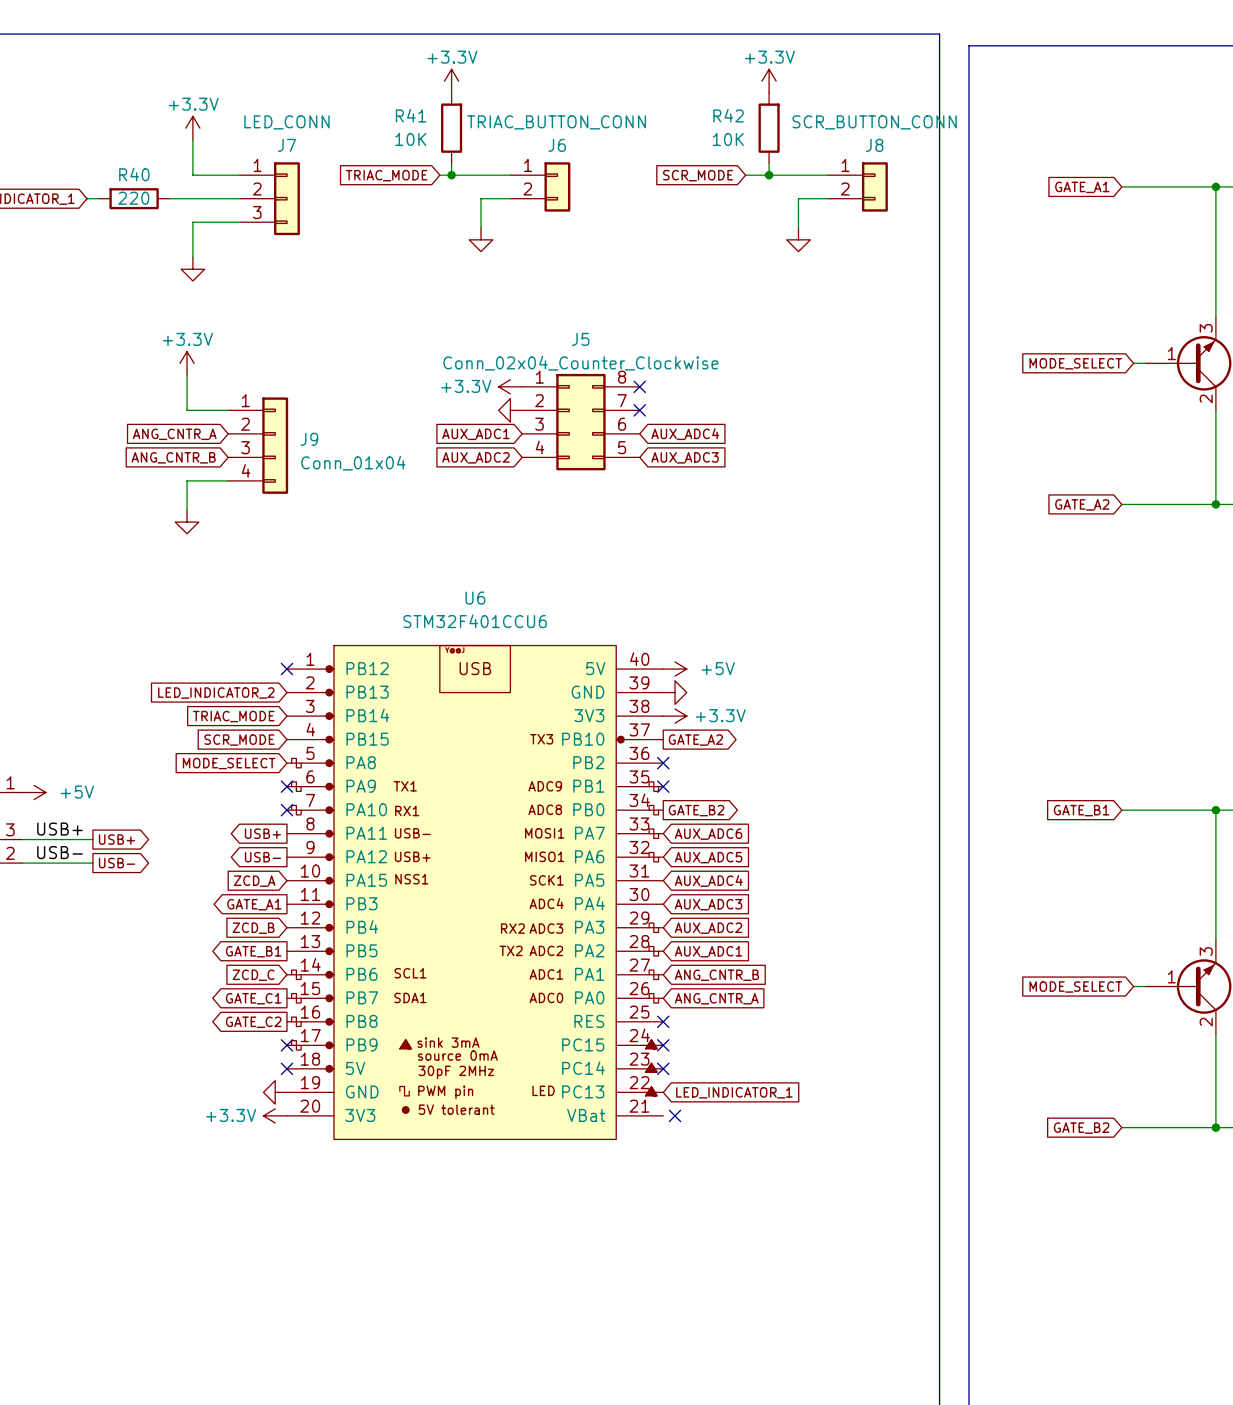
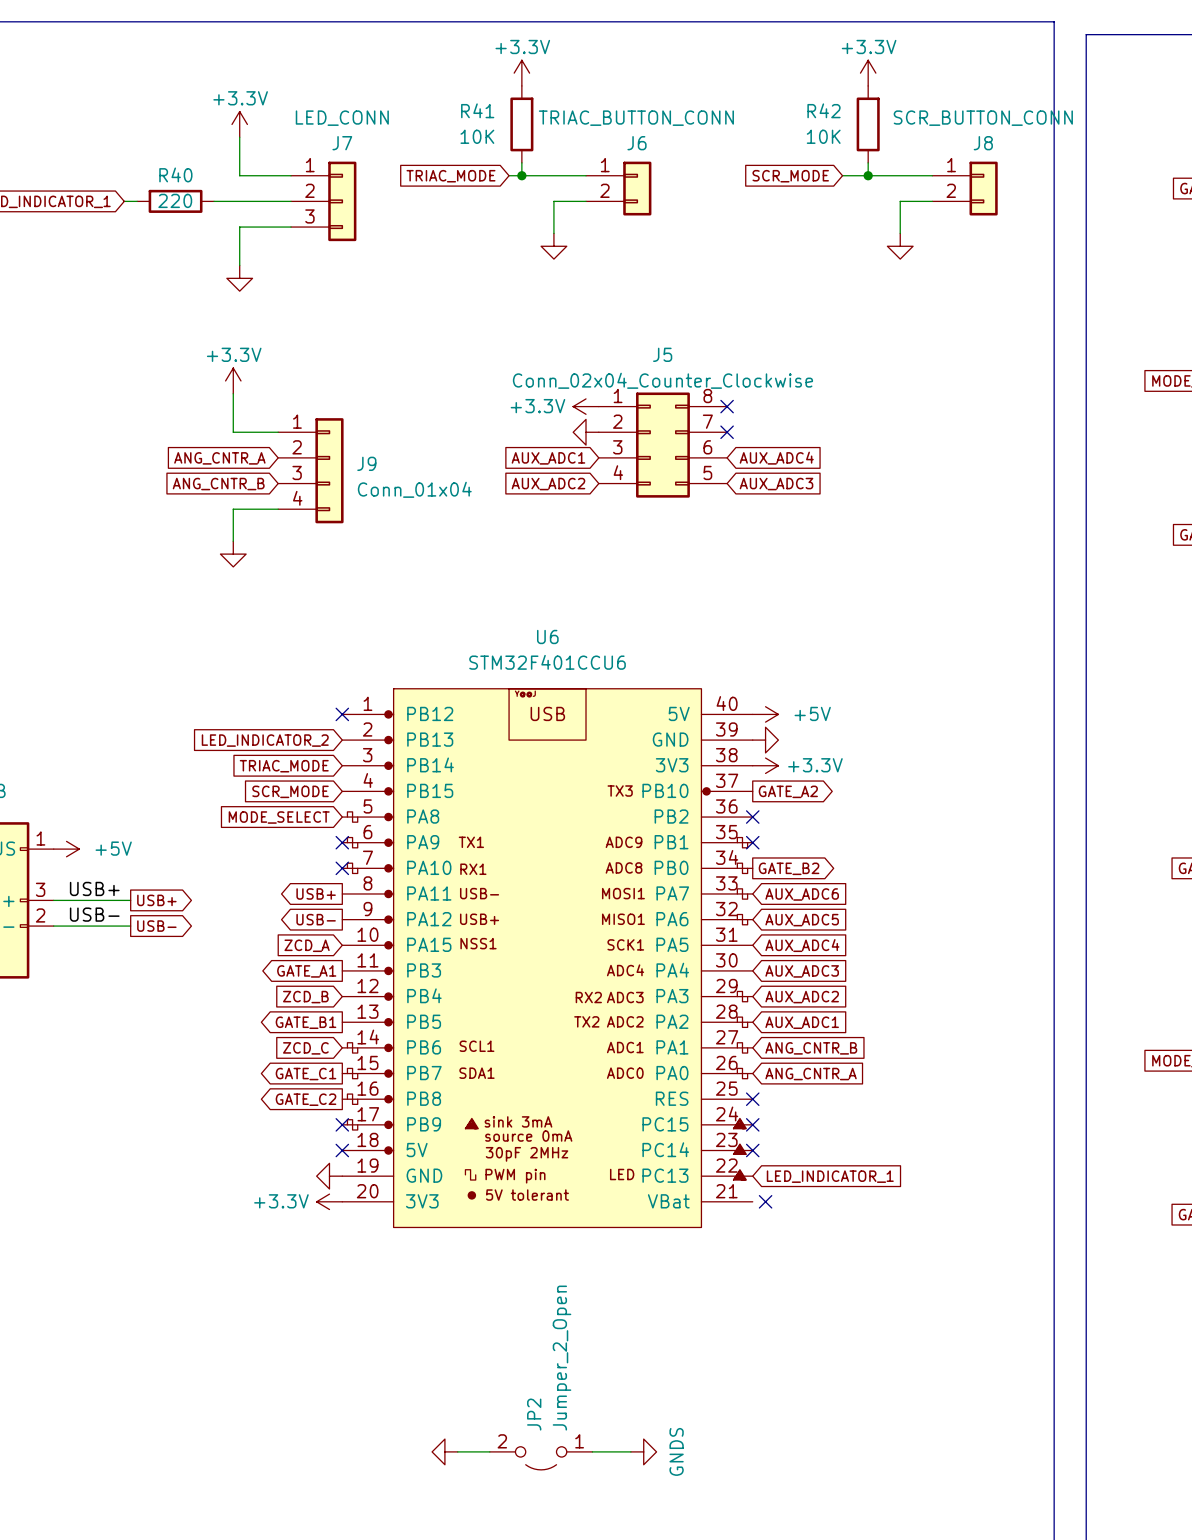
power symbol: none -> (444, 1451)
wire: none -> (457, 1451) (489, 1451)
wire: none -> (592, 1451) (630, 1451)
power symbol: none -> GNDS (643, 1451)
JP2: none -> Jumper_2_Open (541, 1458)

